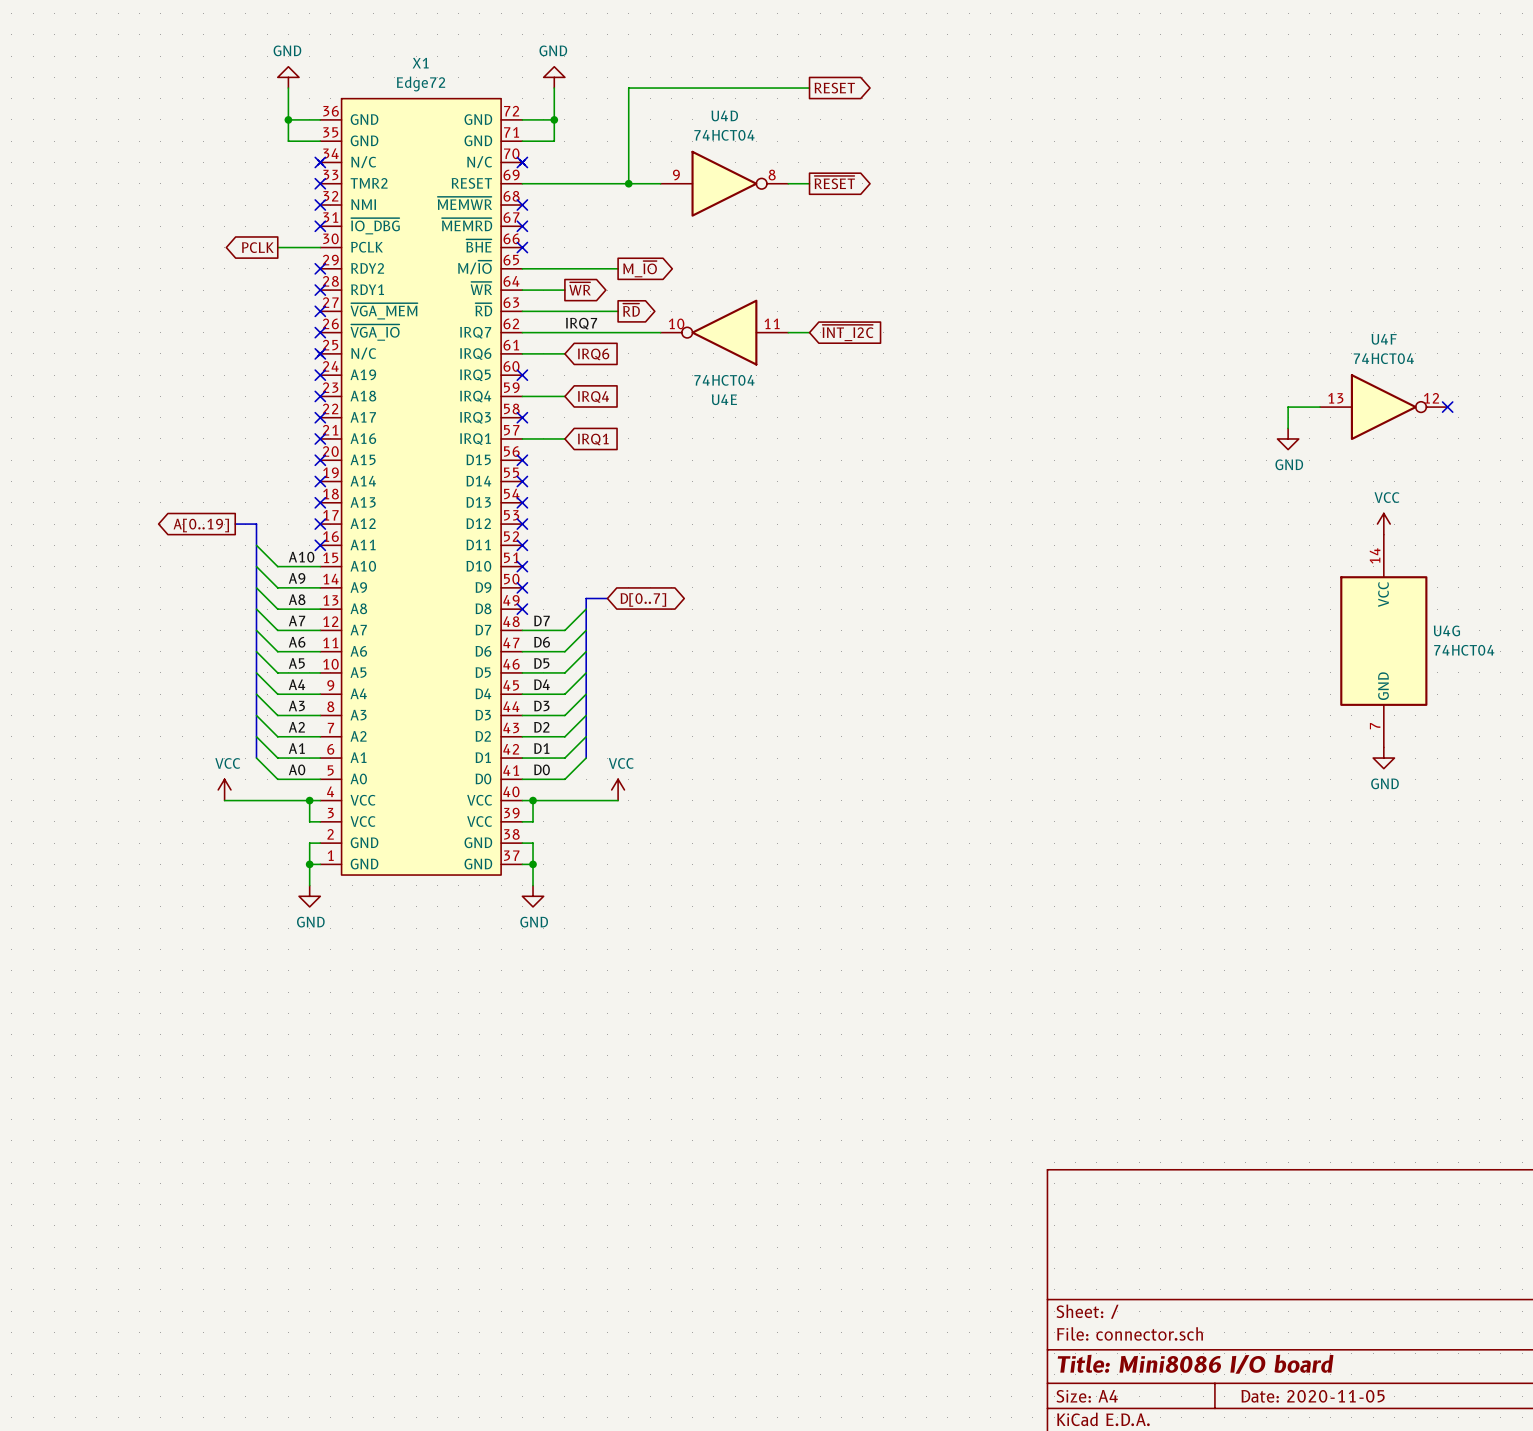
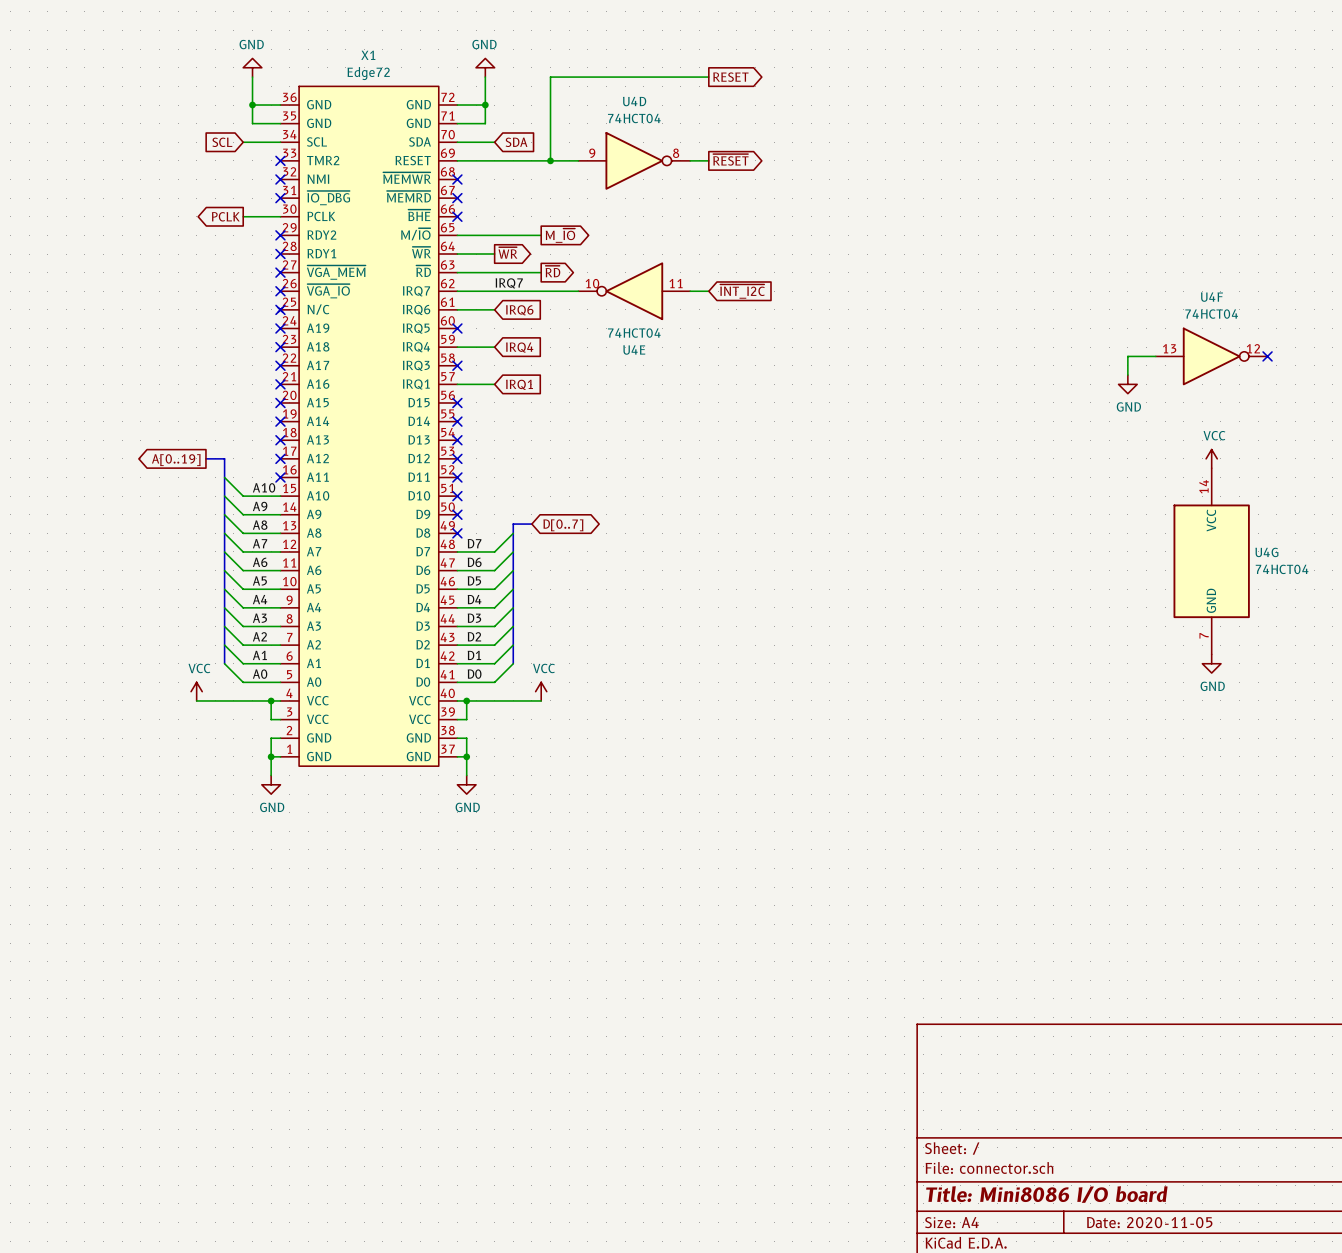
X1 symbol: [317, 98, 525, 876] -> [278, 86, 458, 767]
global label: none -> SCL (222, 142)
wire: none -> (243, 142) (280, 142)
no-connect mark: (320, 162) -> none
wire: none -> (457, 142) (494, 142)
no-connect mark: (522, 162) -> none
global label: none -> SDA (516, 142)

